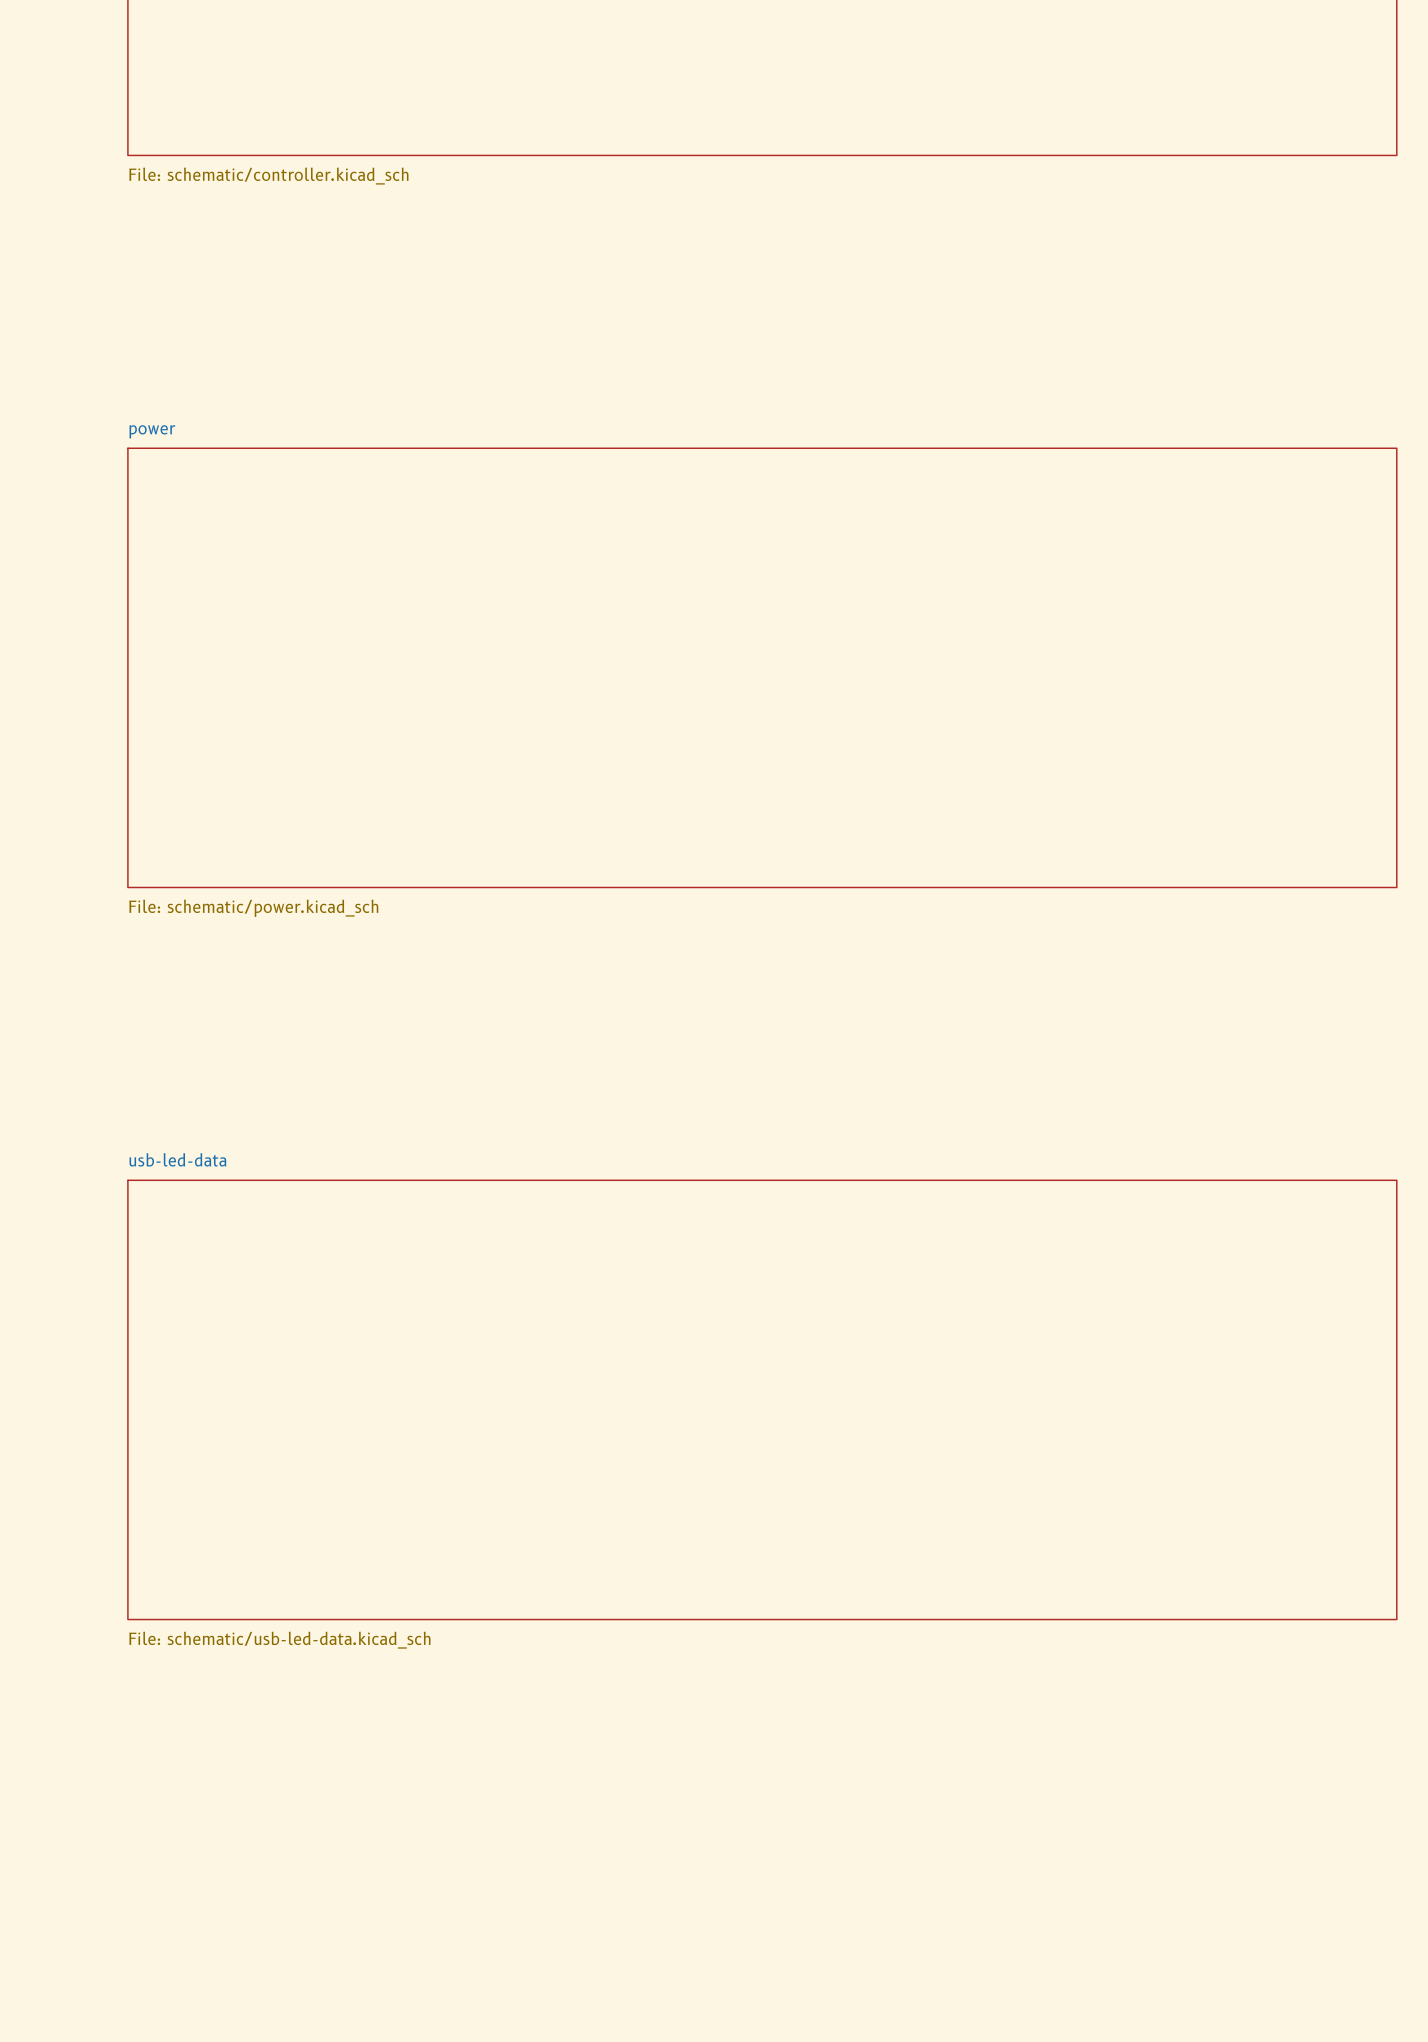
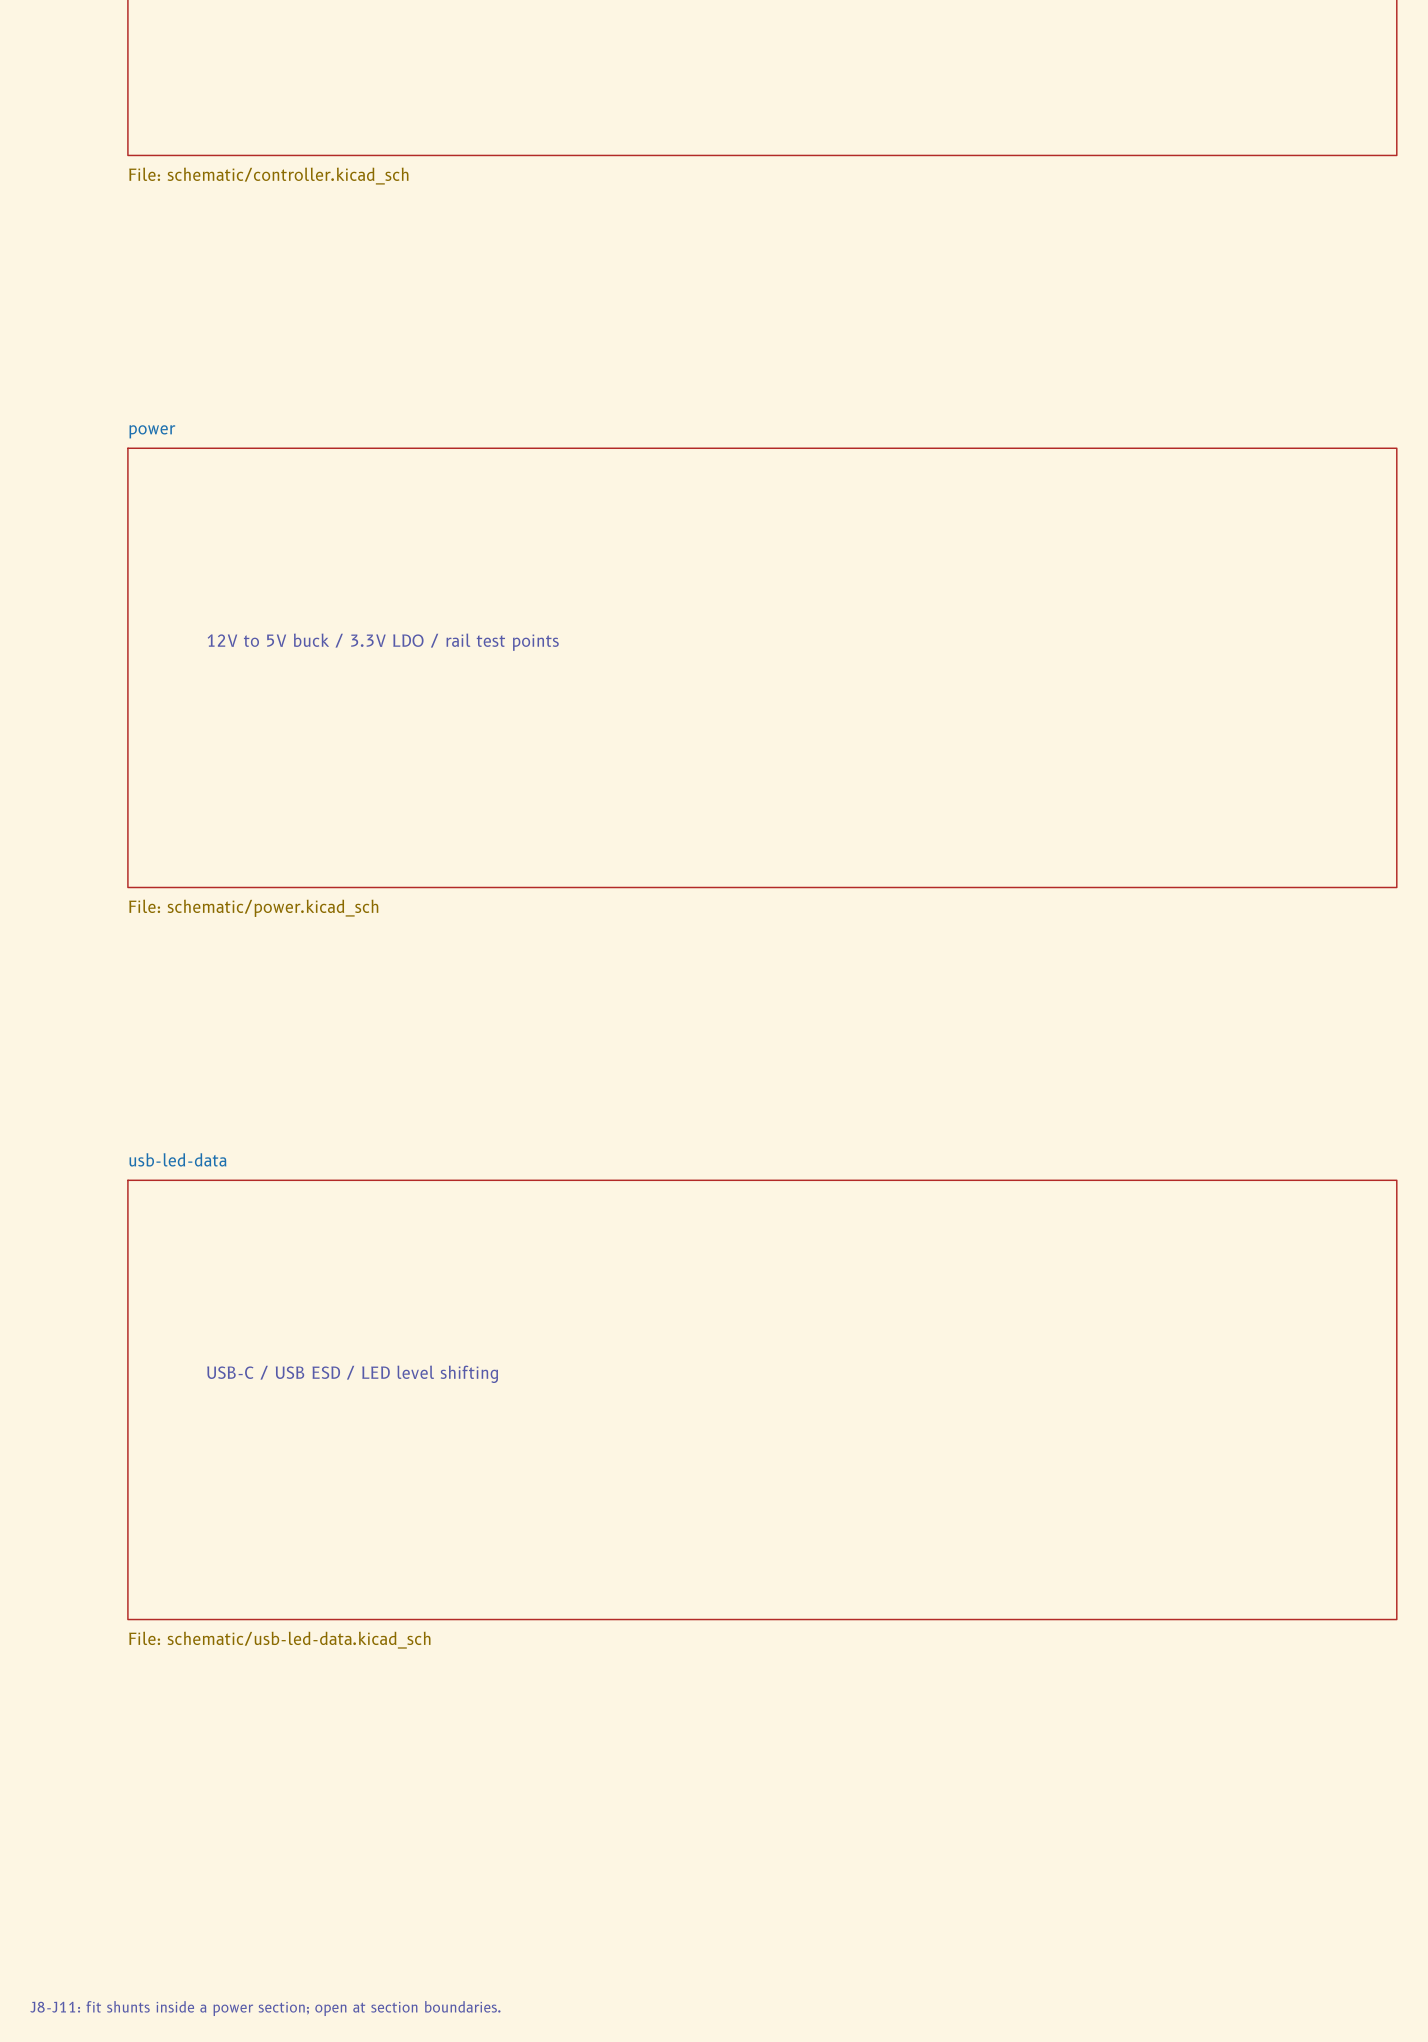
text: none -> 12V to 5V buck / 3.3V LDO / rail test points (383, 642)
text: none -> USB-C / USB ESD / LED level shifting (352, 1374)
text: none -> J8-J11: fit shunts inside a power section; open at section boundaries. (265, 2008)

